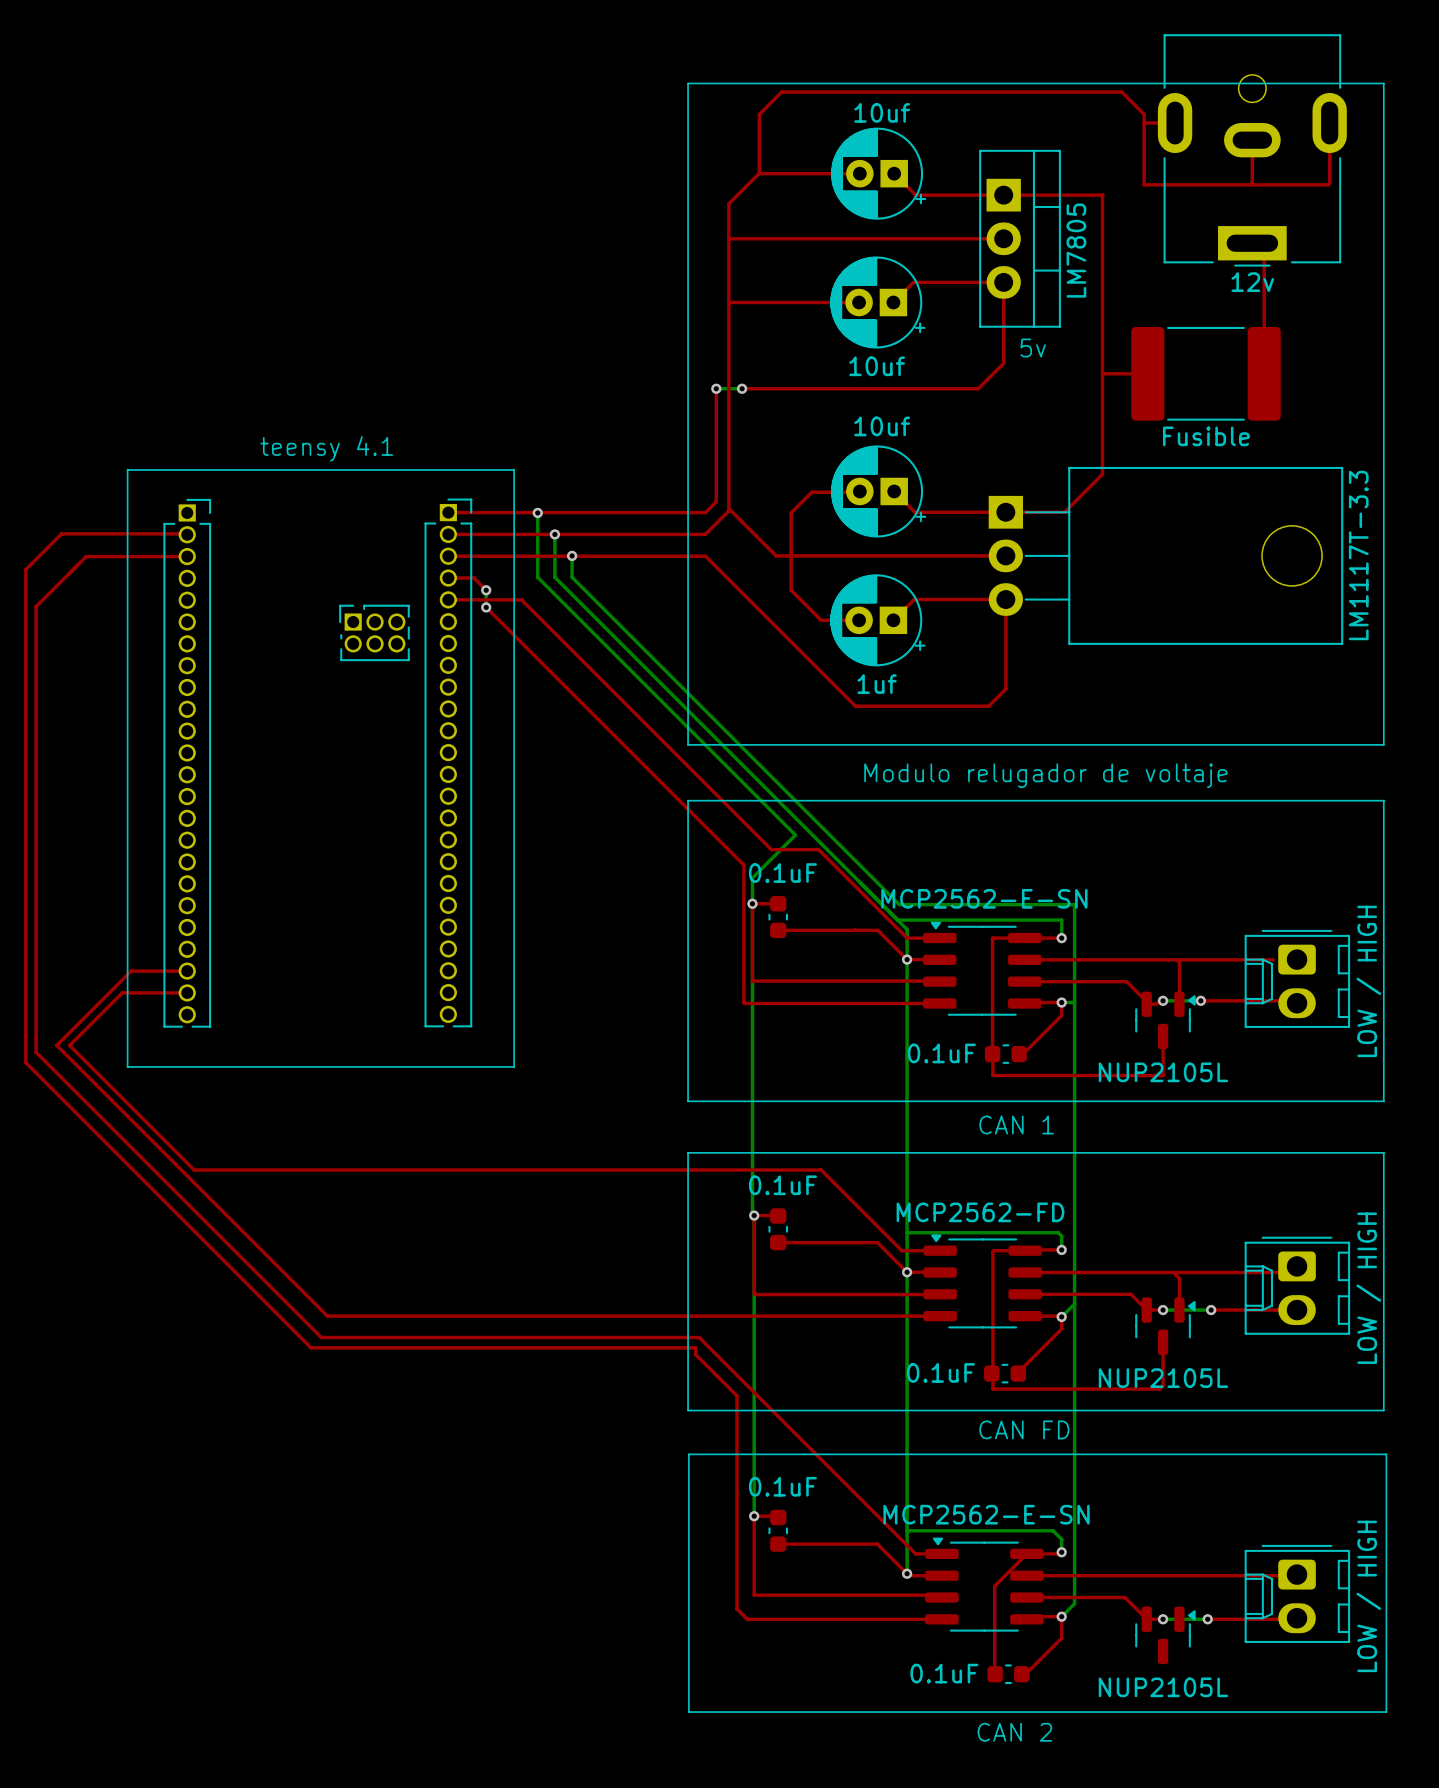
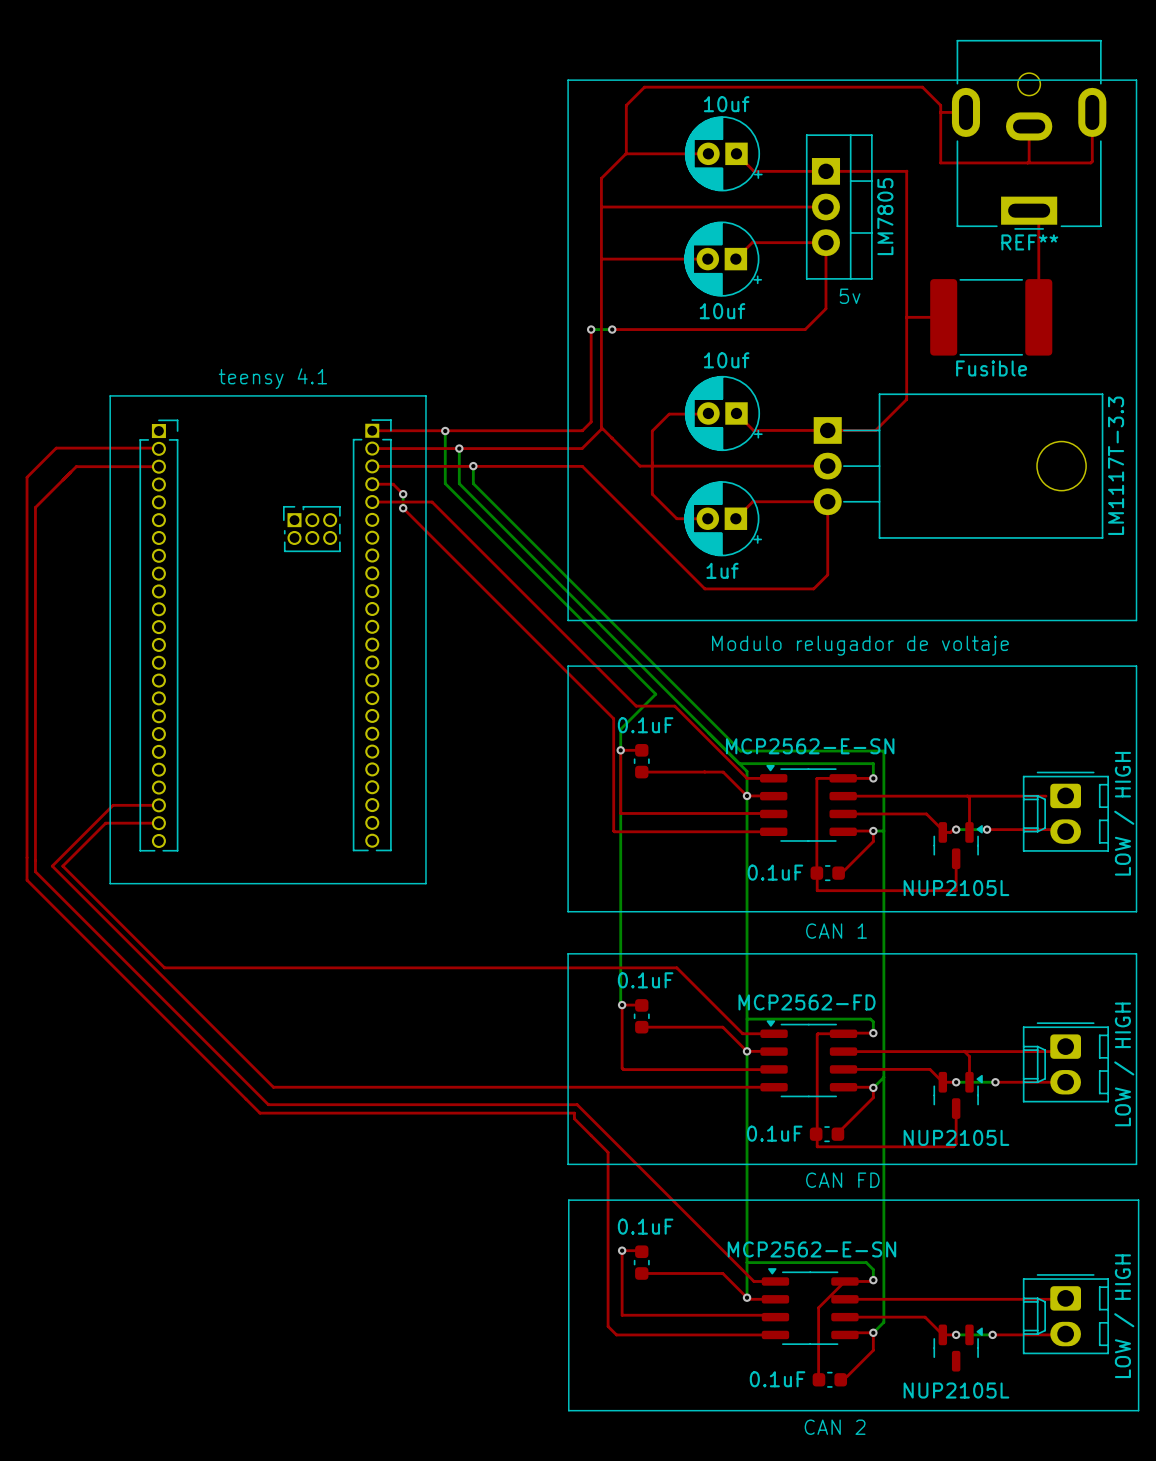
12v name: 12v (1252, 282) -> REF** (1029, 242)
bottom track: (754, 1215) (754, 1514) -> none

